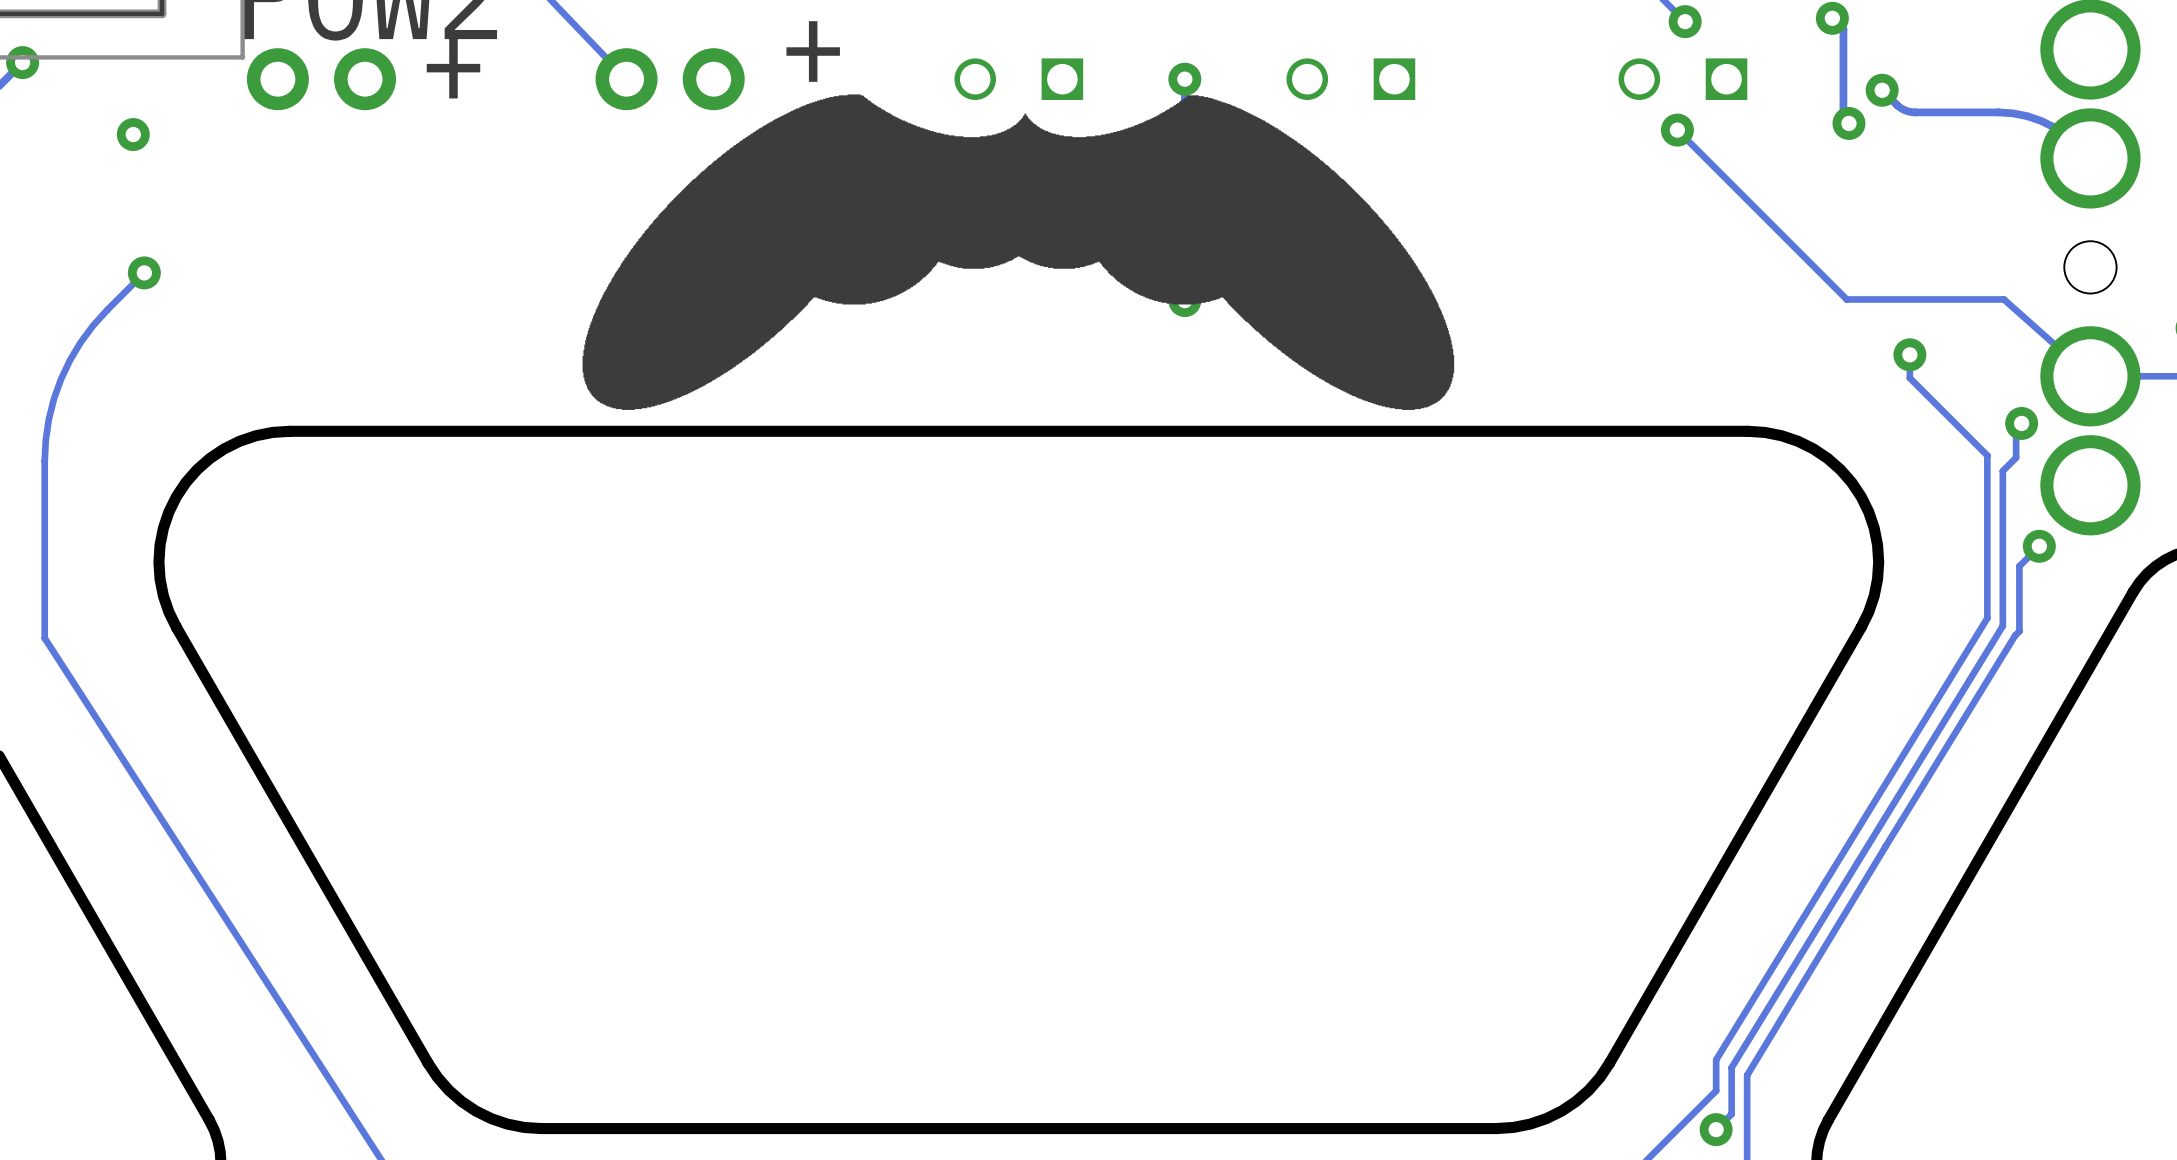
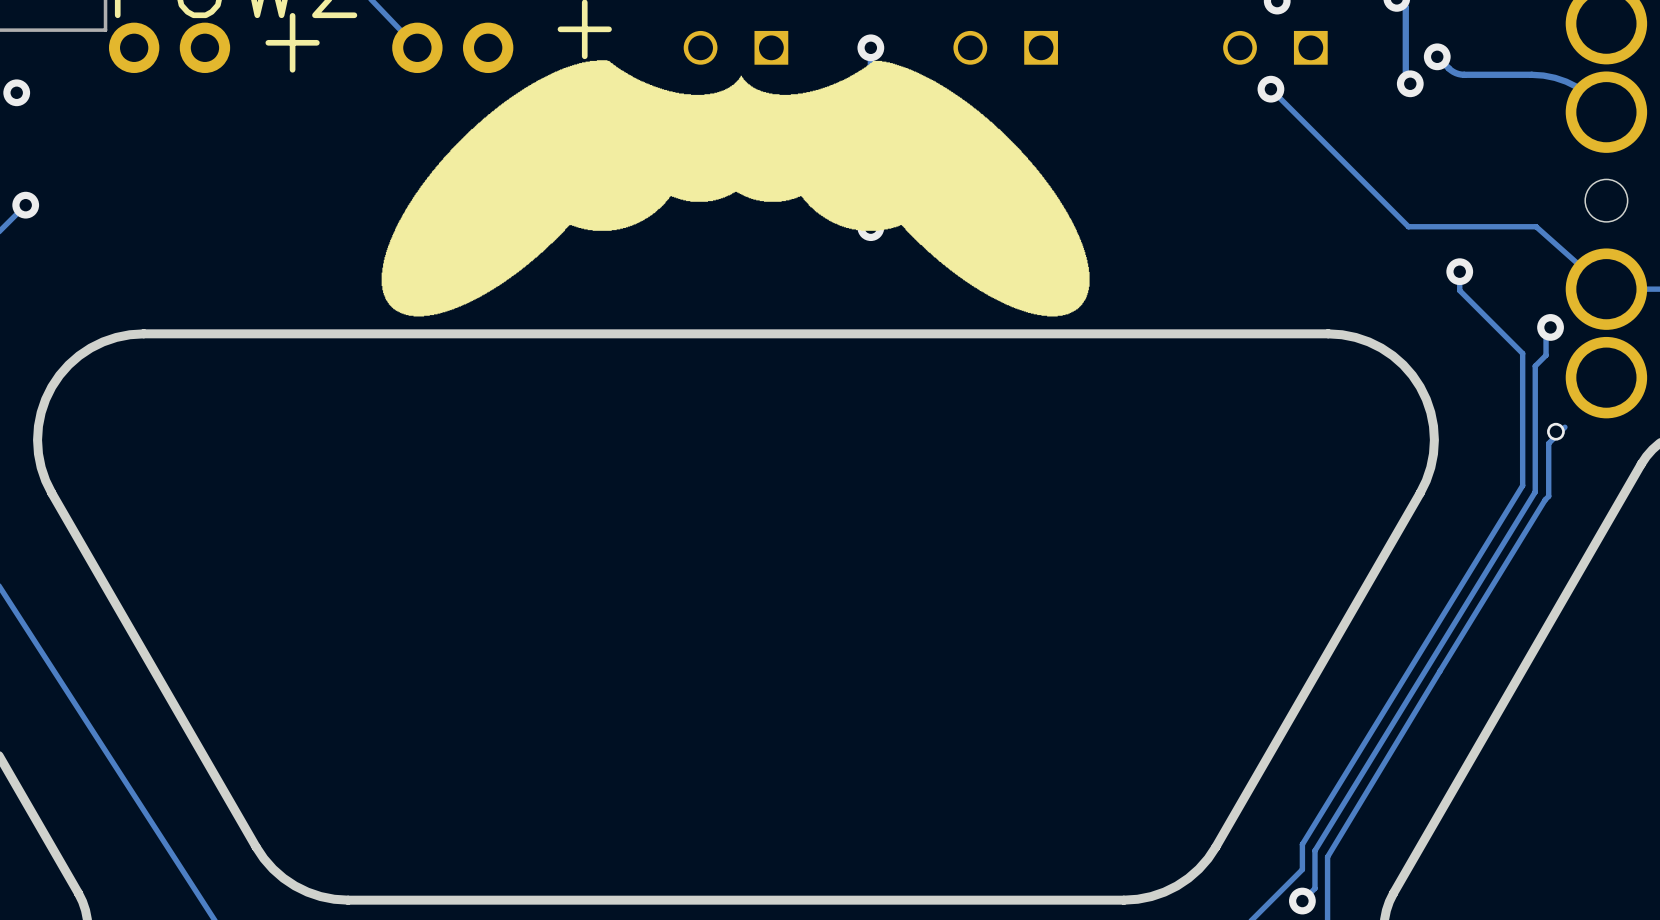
via size: [2022, 529, 2056, 563] -> [1547, 422, 1565, 441]

